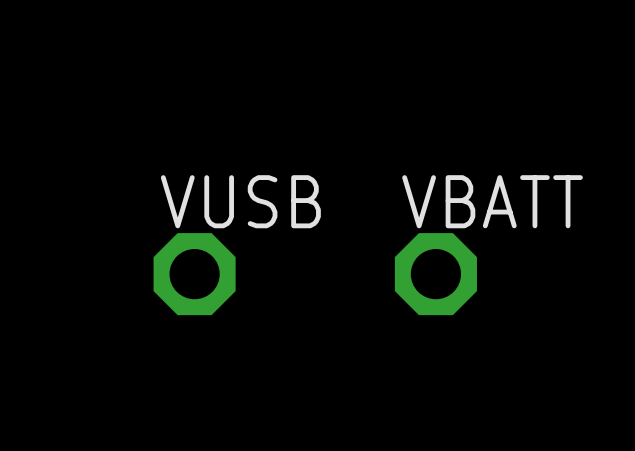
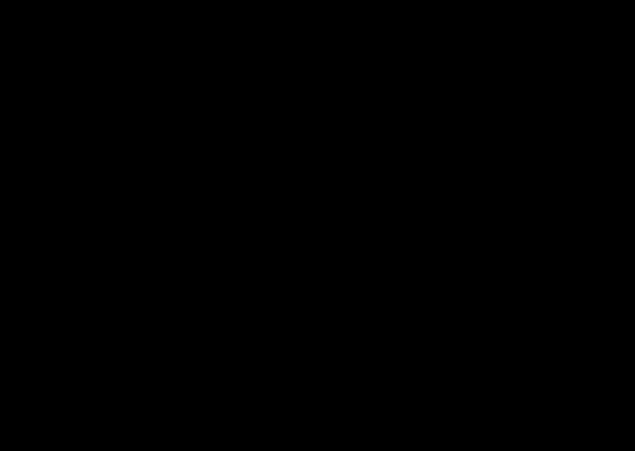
VUSB: (194, 274) -> none
VBATT: (435, 274) -> none

